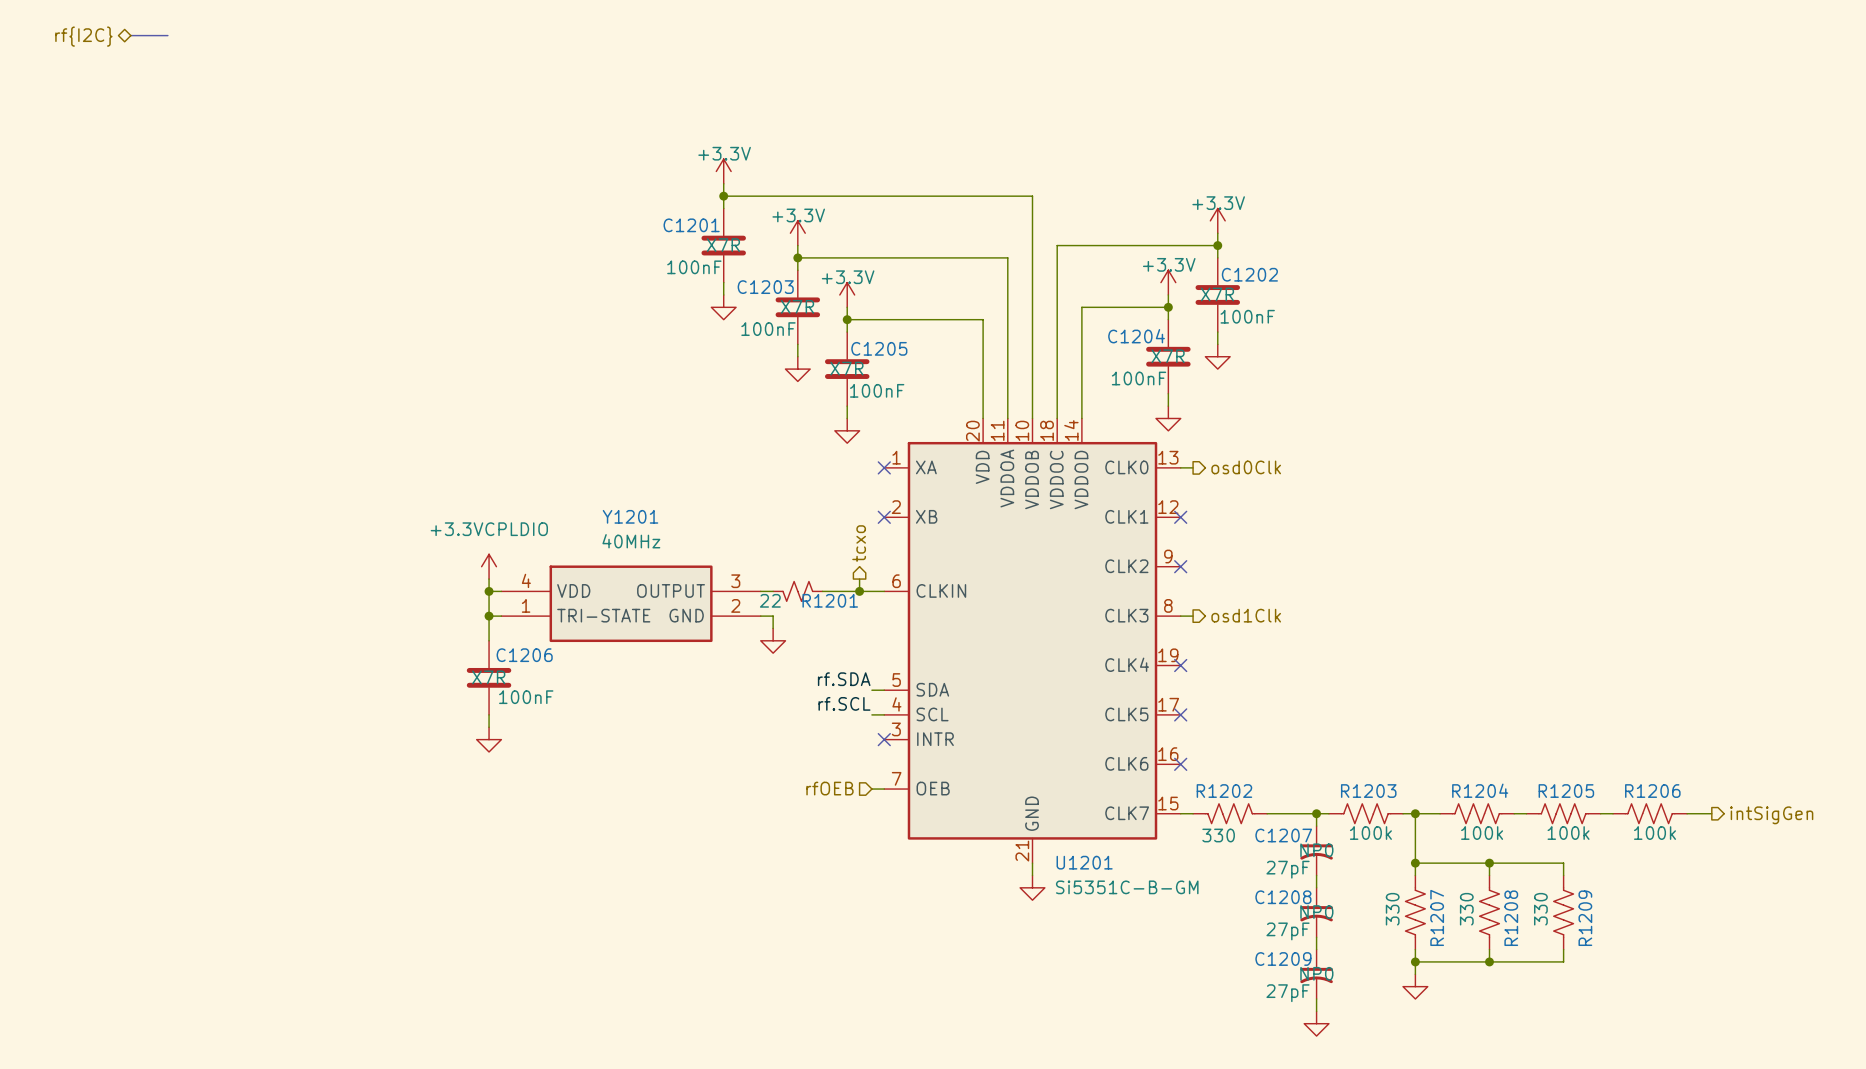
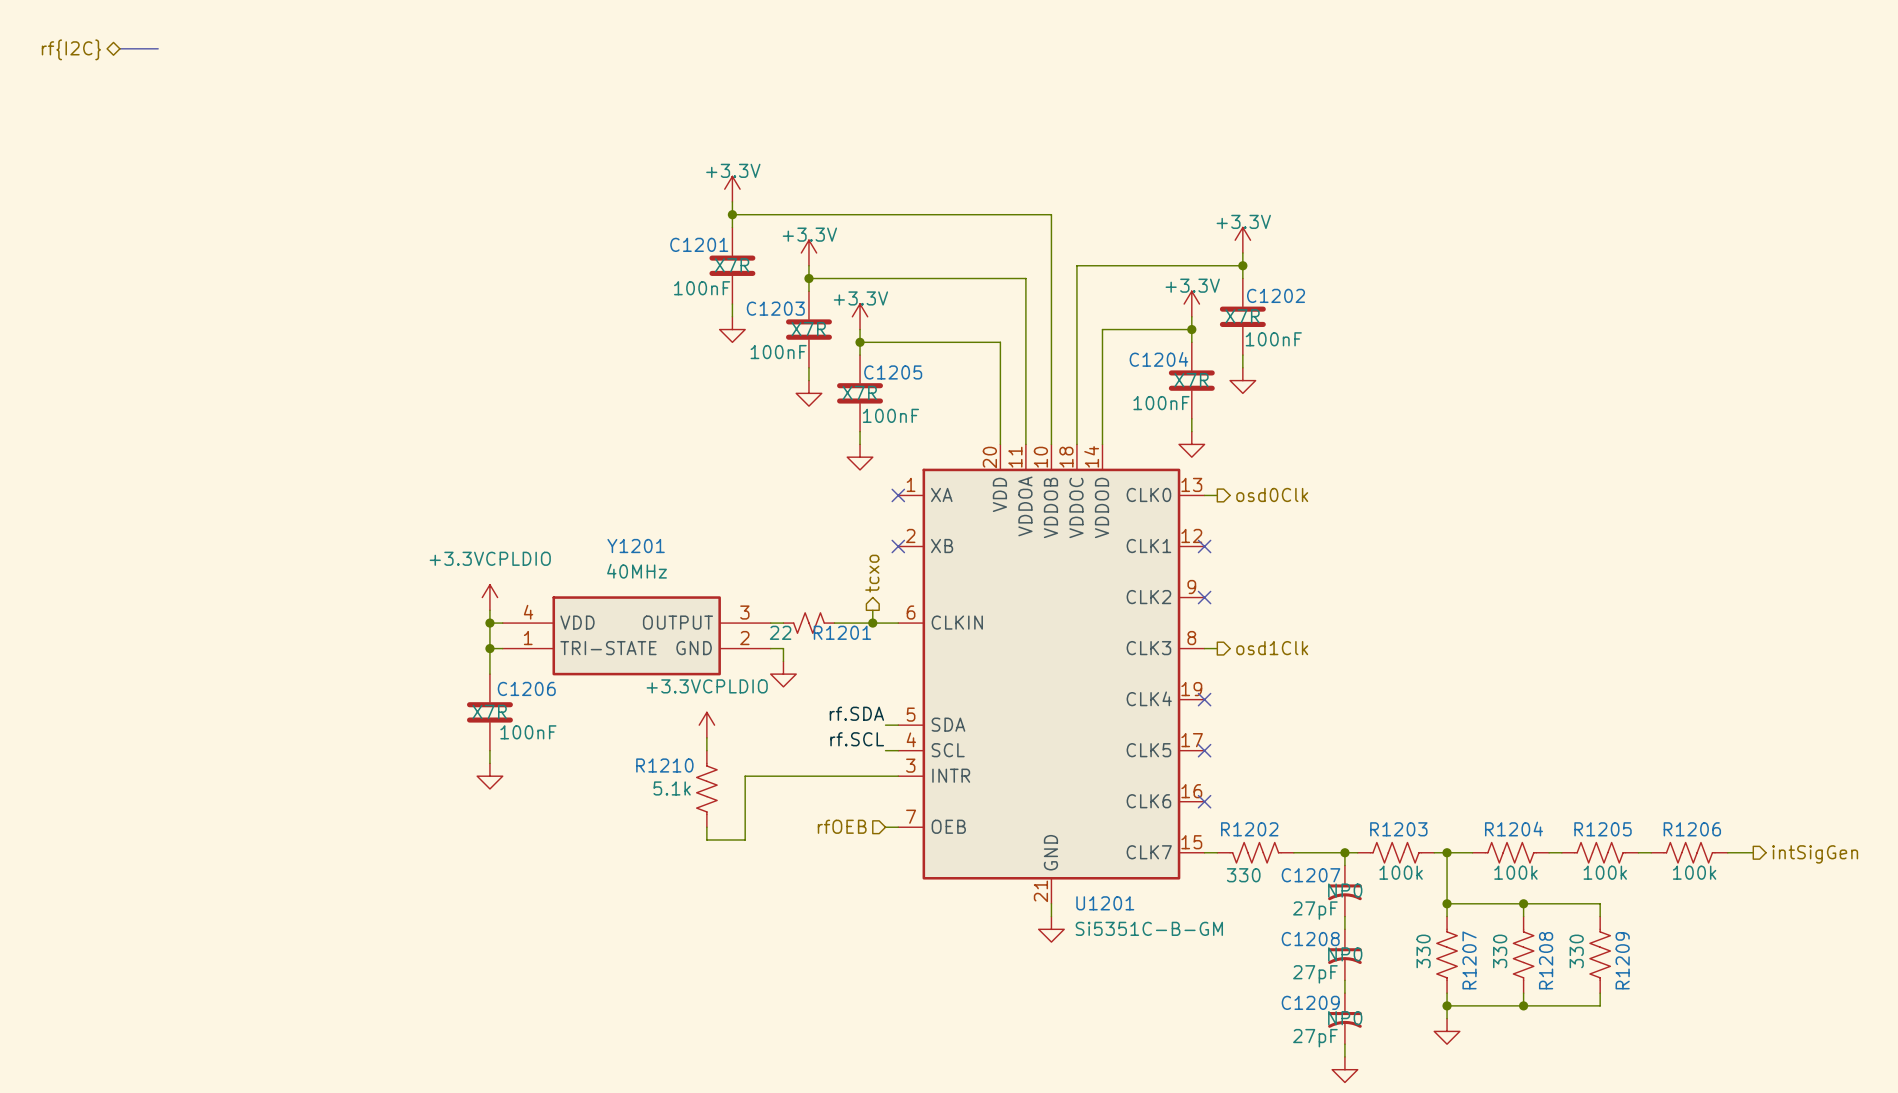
power symbol: none -> +3.3VCPLDIO (706, 725)
wire: none -> (706, 737) (706, 750)
wire: none -> (898, 776) (745, 776) (745, 839) (706, 839) (706, 827)
no-connect mark: (884, 739) -> none
R1210: none -> 5.1k (706, 788)

